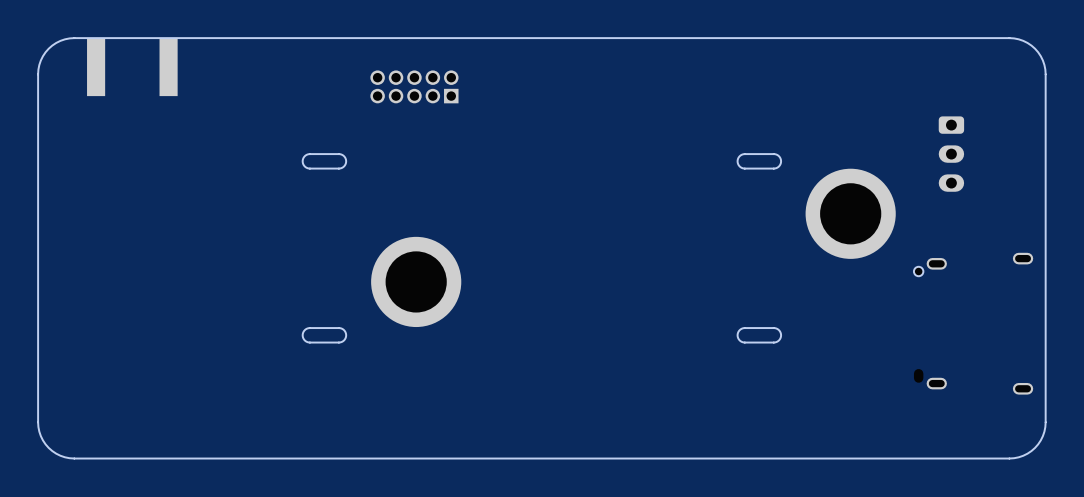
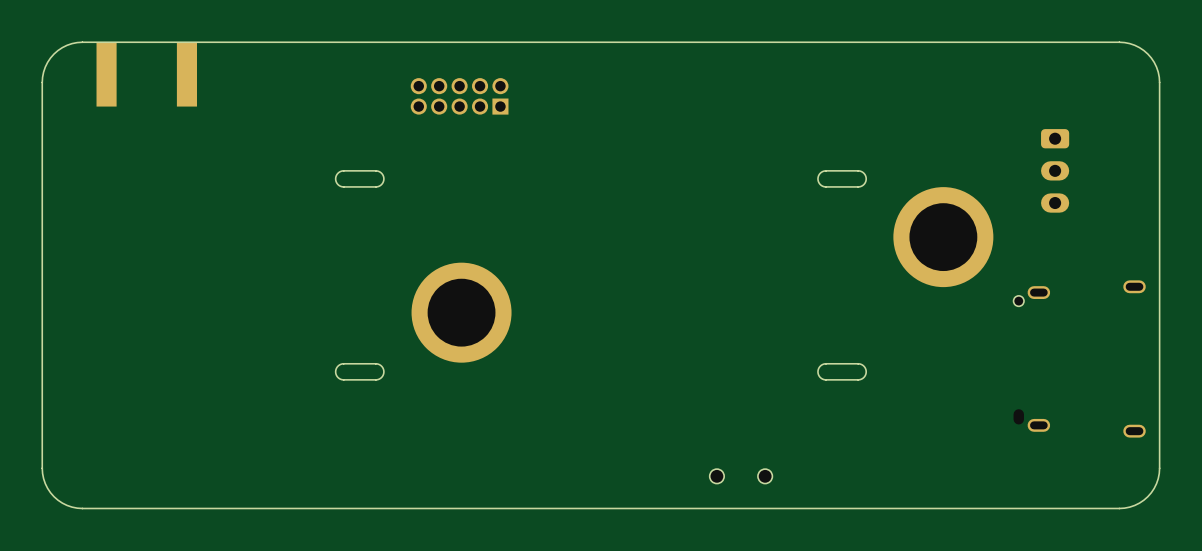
part: none -> (741, 476)

